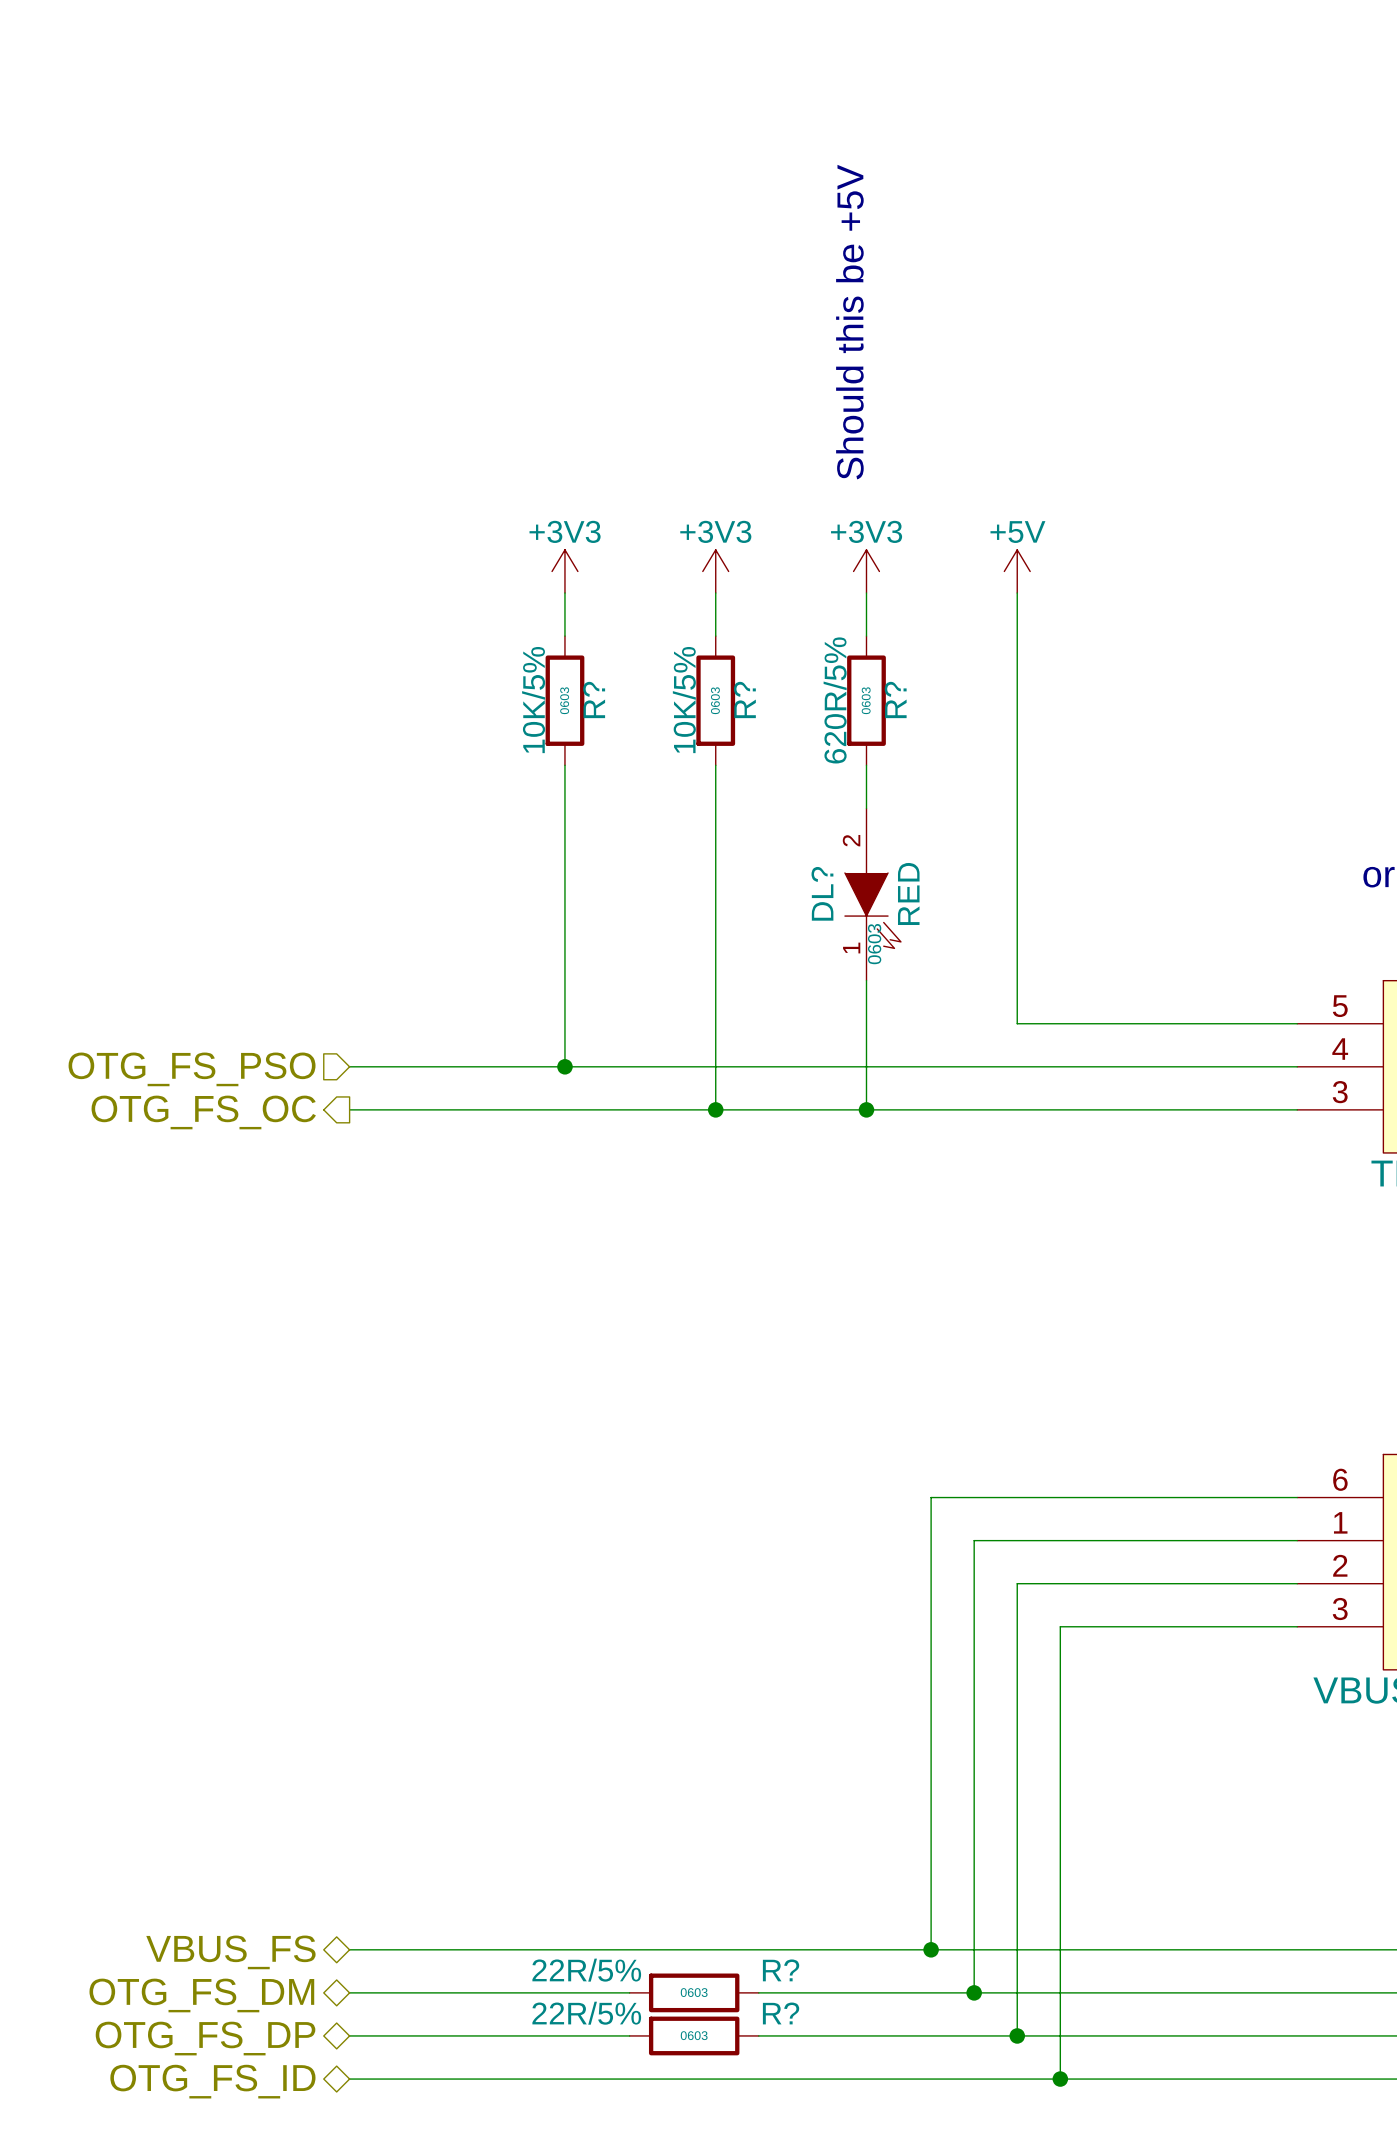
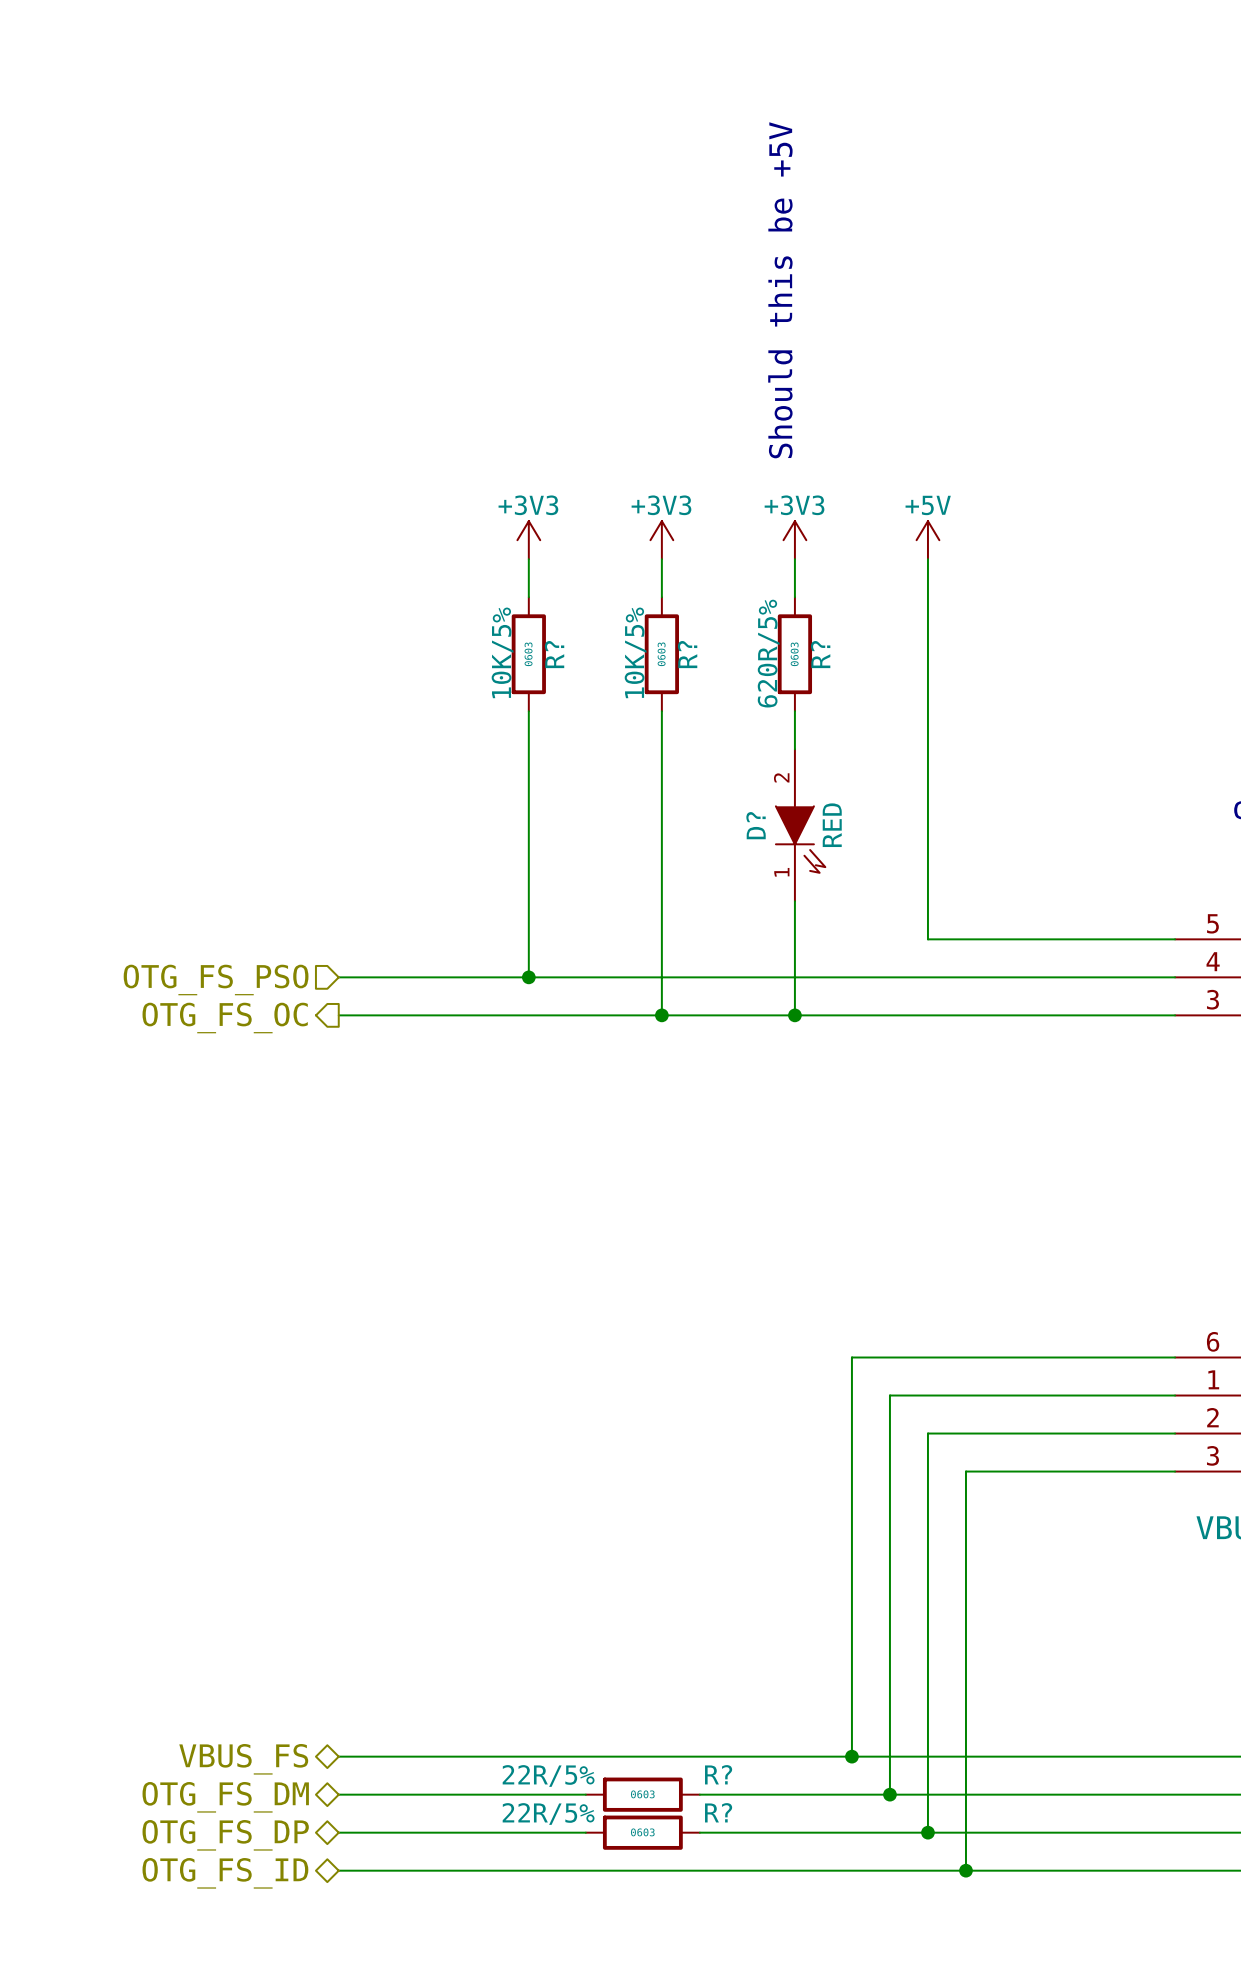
DL? name: DL? (822, 893) -> D? (756, 825)
DL? text: 0603 (874, 944) -> none

